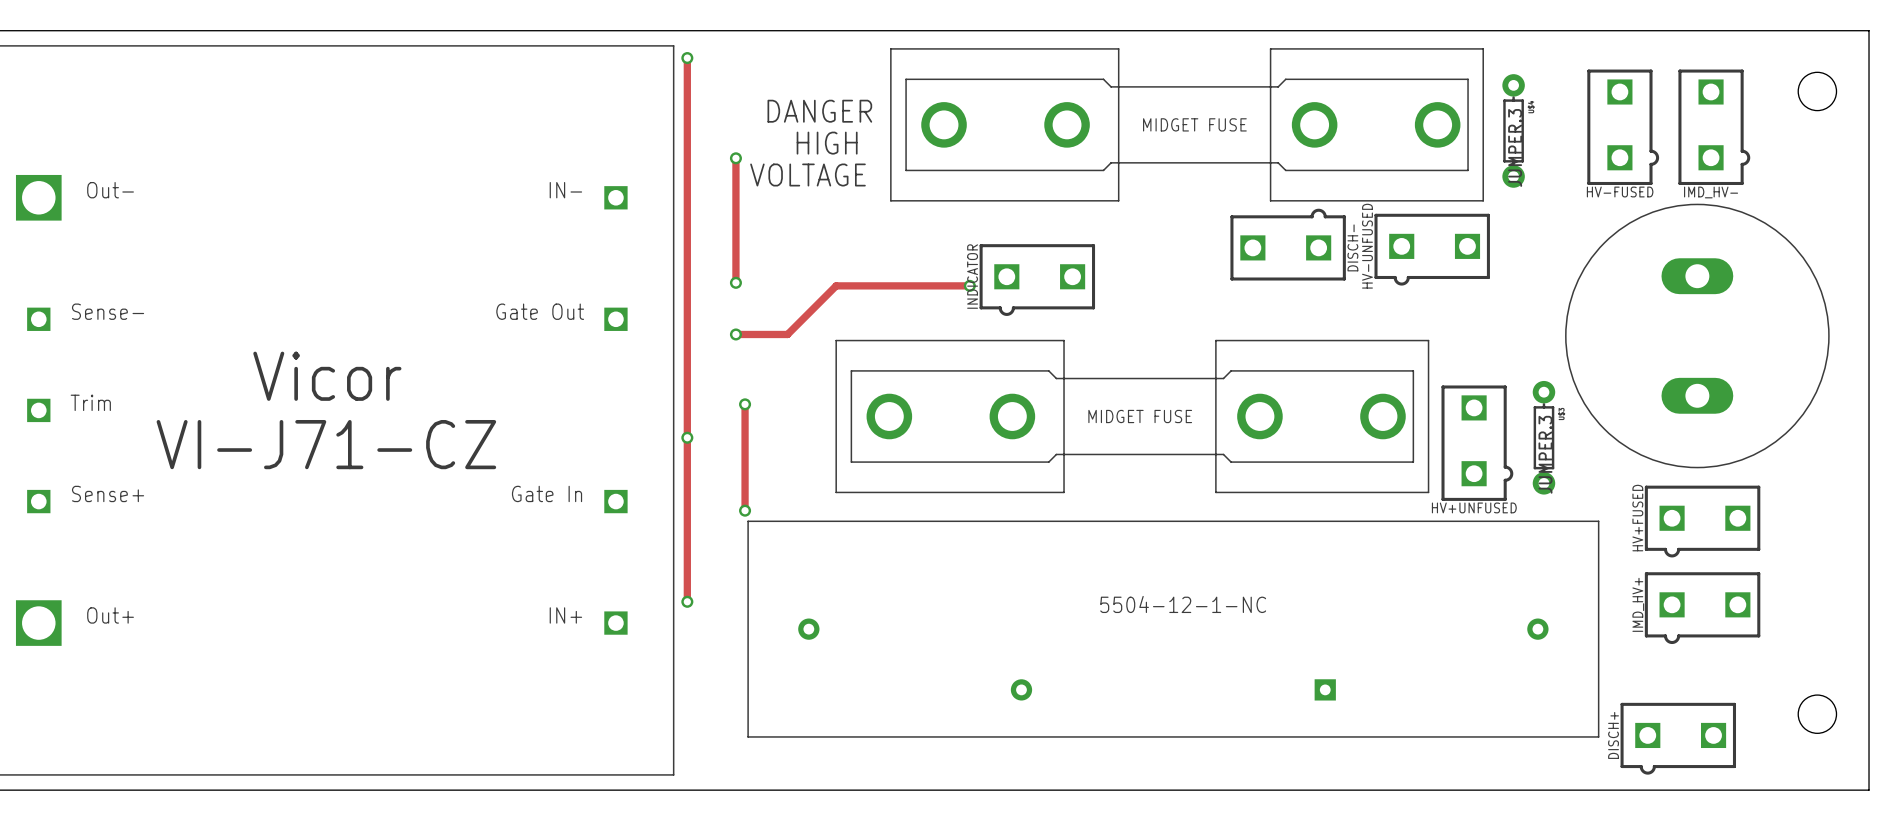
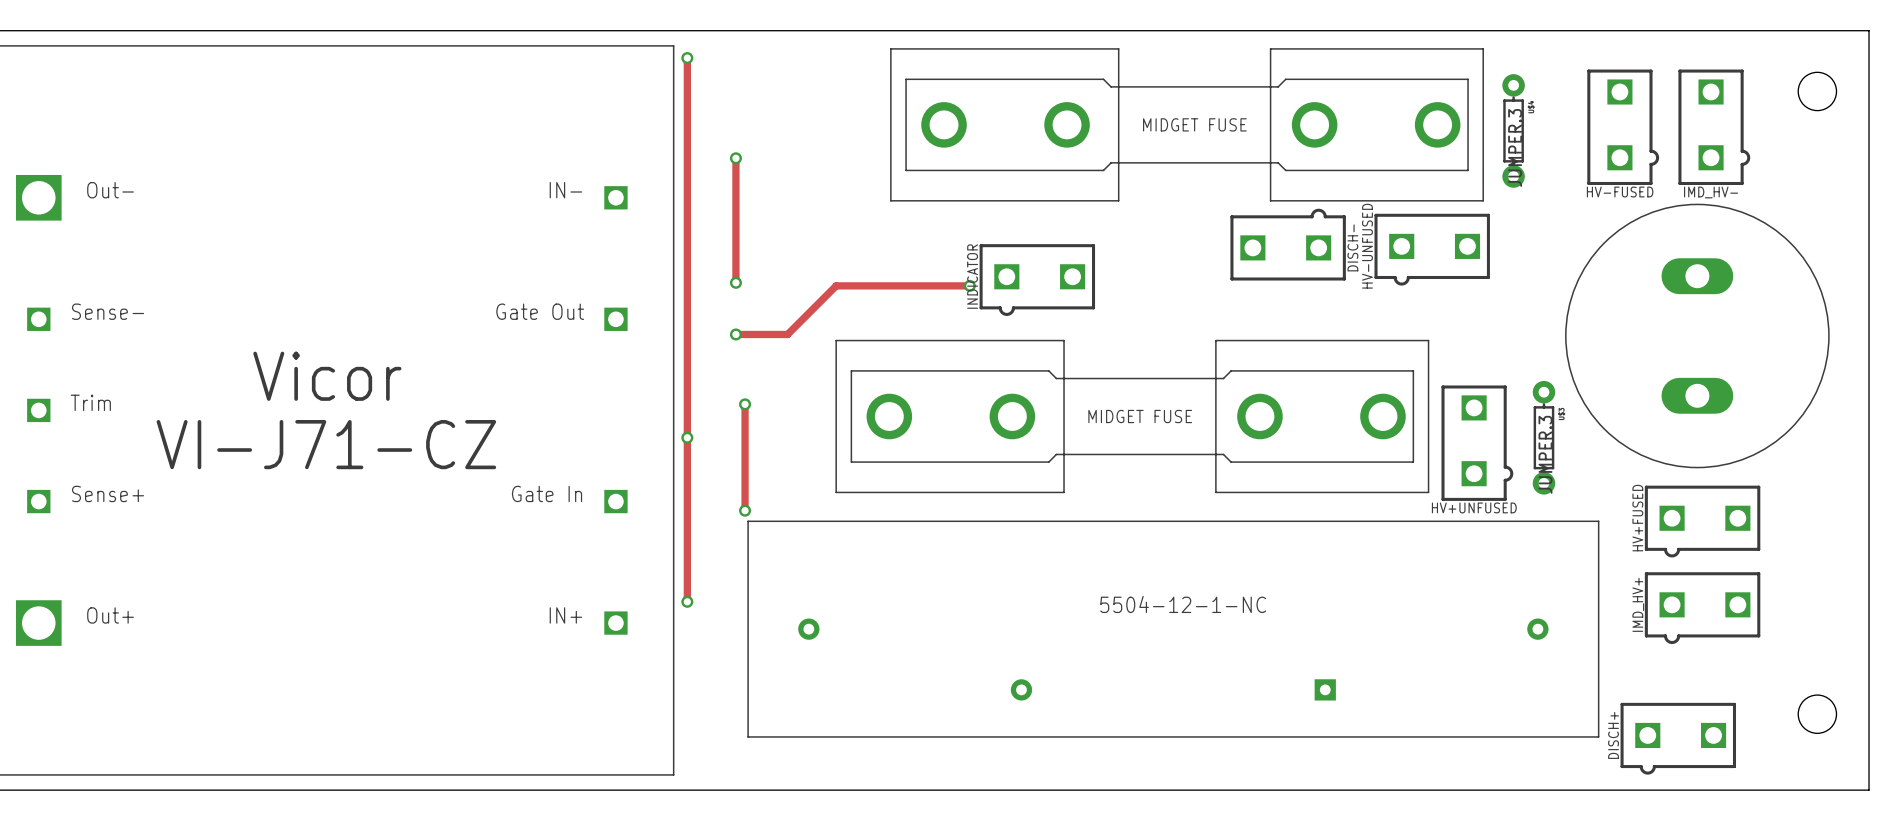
text: DANGER (819, 111) -> none
text: HIGH (827, 143) -> none
text: VOLTAGE (807, 175) -> none

